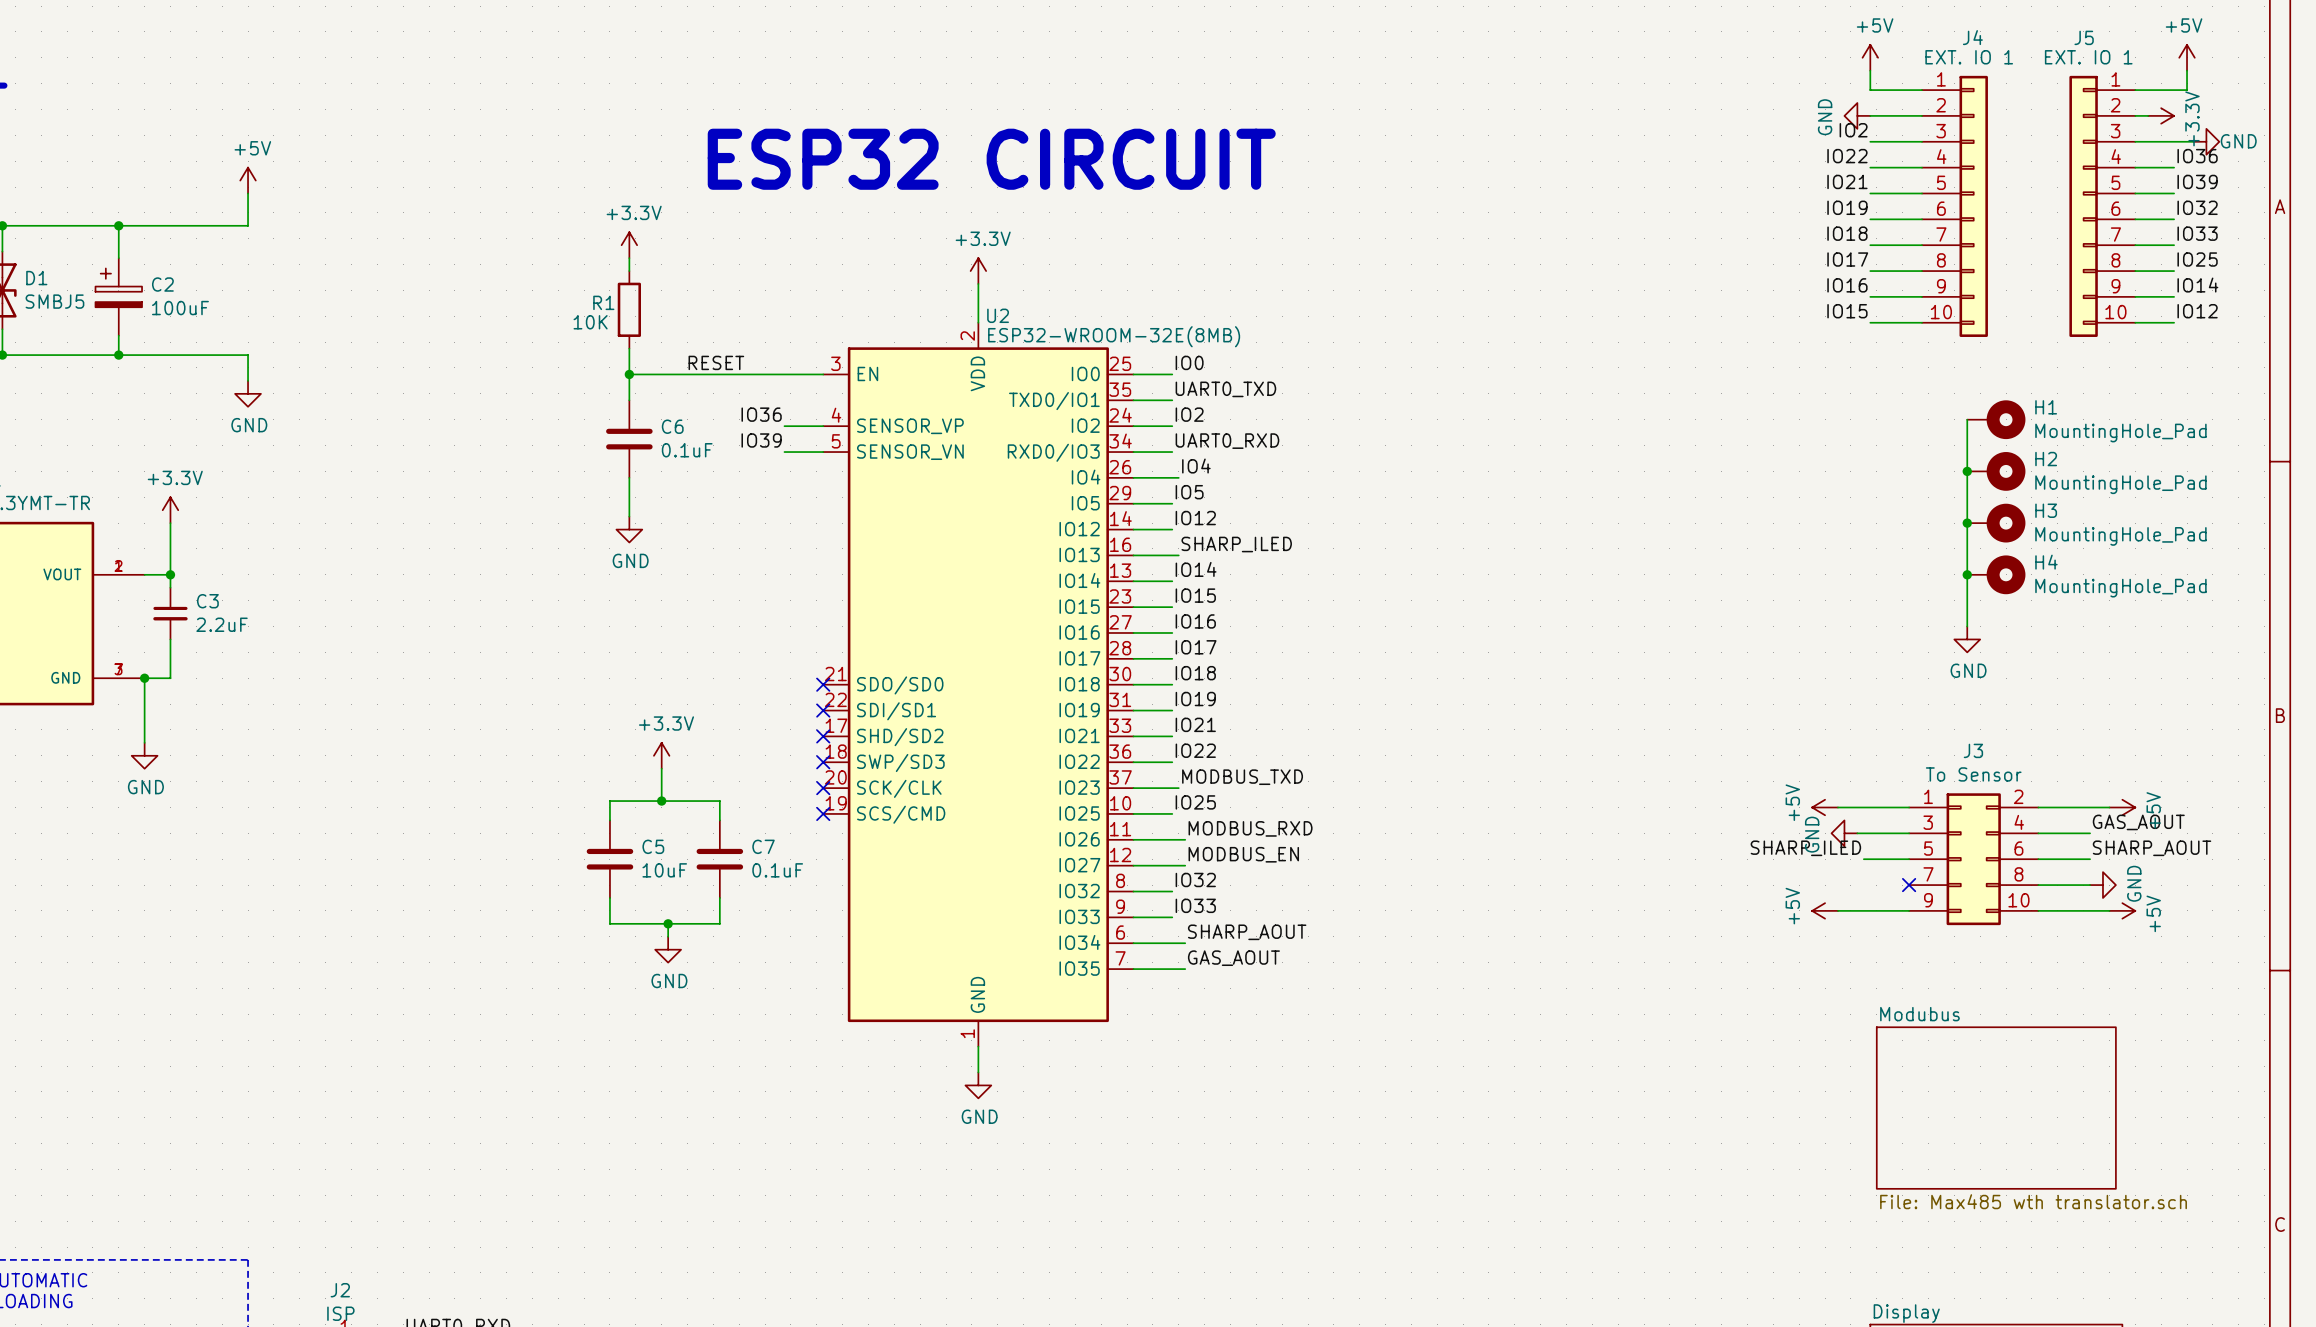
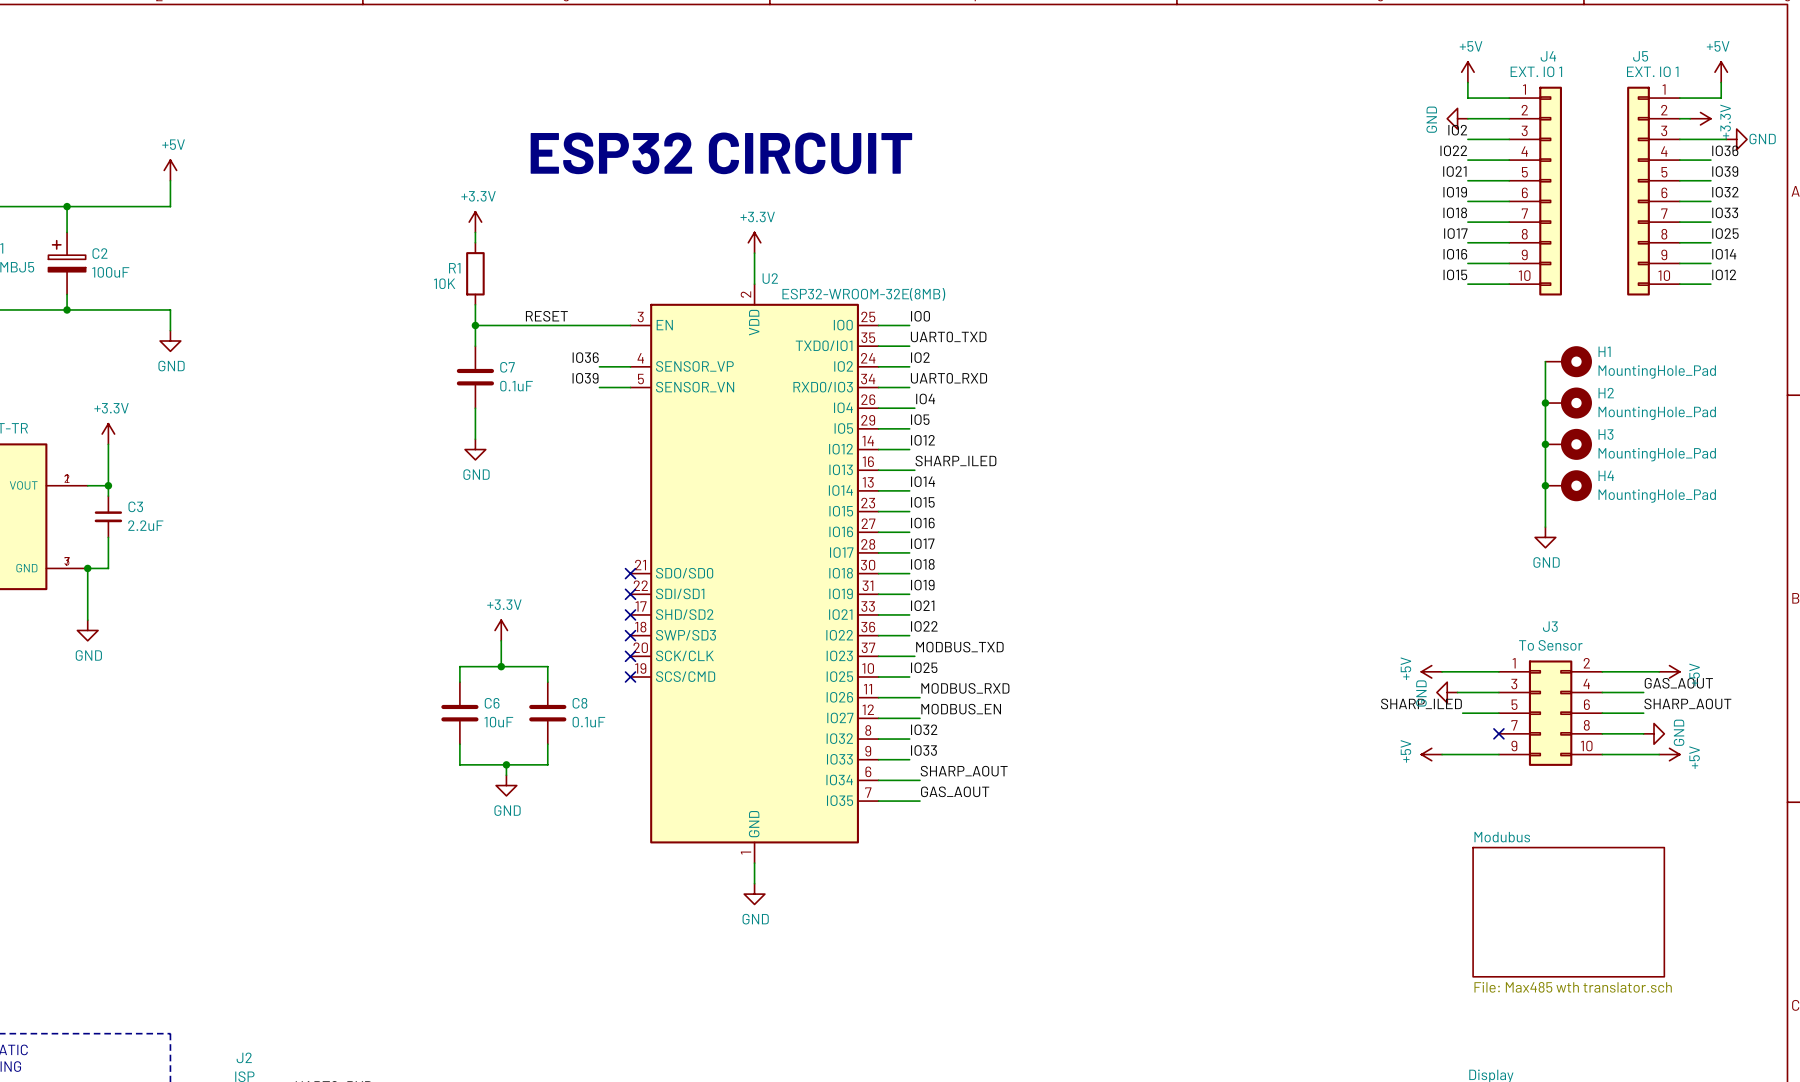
C6 name: C6 (672, 426) -> C7 (507, 367)
C5 name: C5 (653, 846) -> C6 (492, 703)
C7 name: C7 (763, 846) -> C8 (579, 703)

